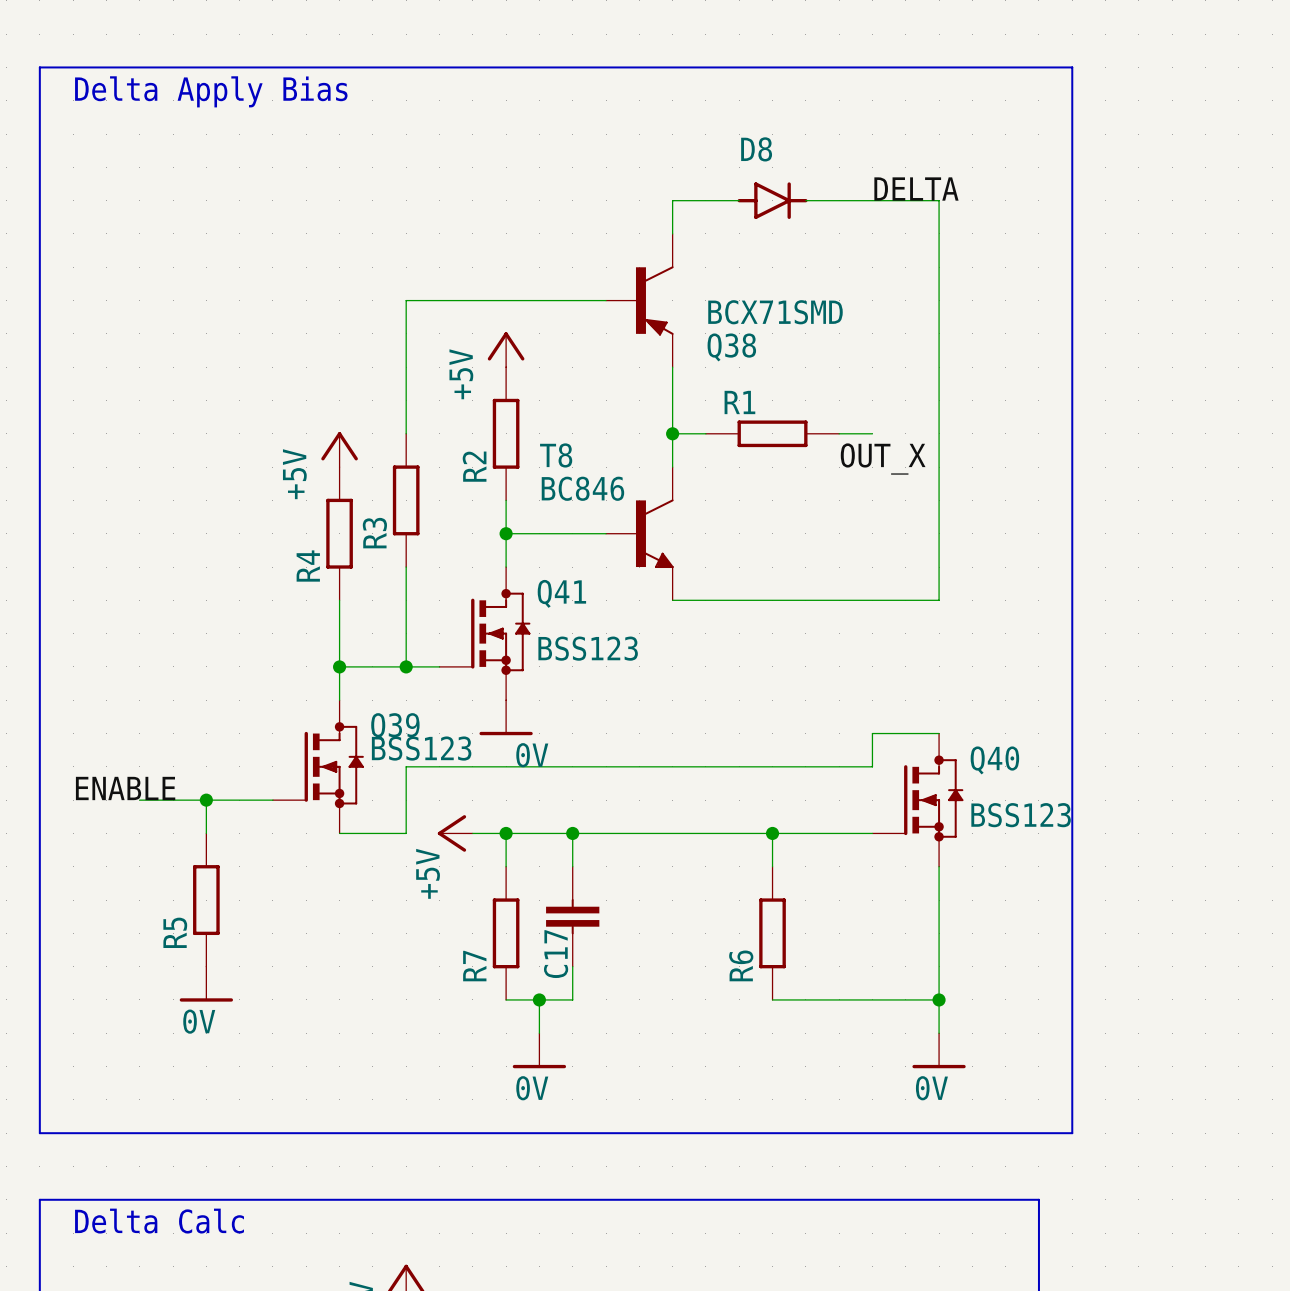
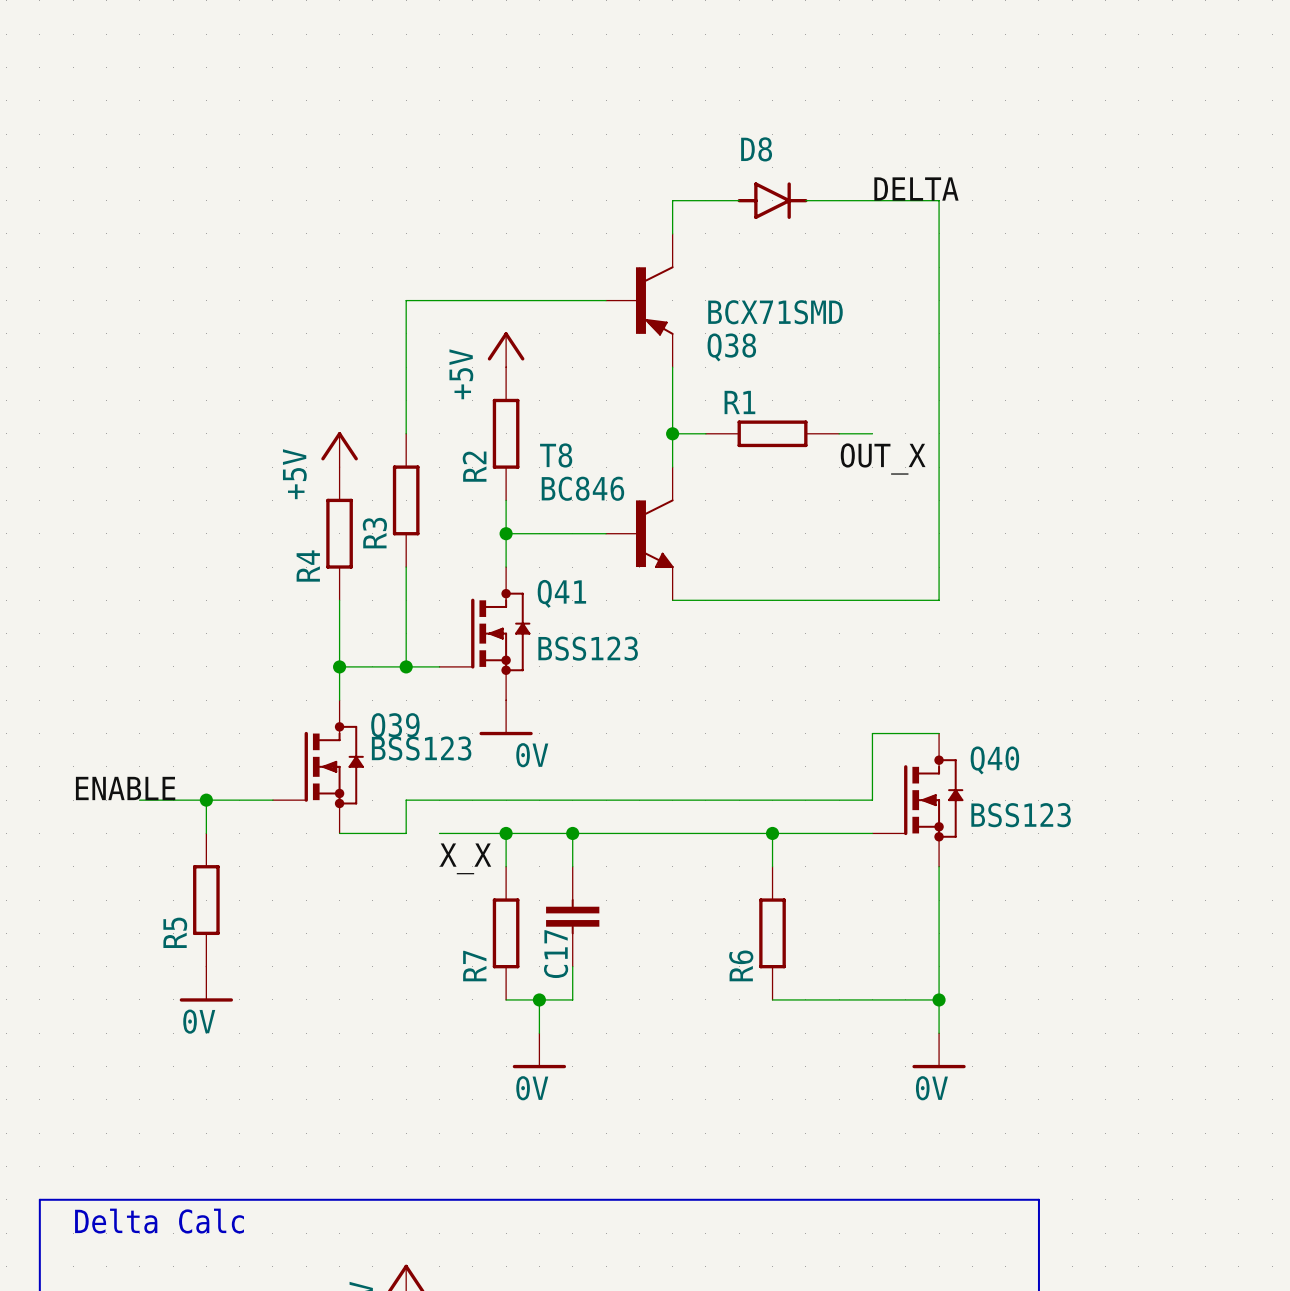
line: (39, 67) (39, 1133) (1072, 1133) (1072, 67) (39, 67) -> none
text: Delta Apply Bias (211, 91) -> none
wire: (872, 766) (406, 766) (406, 800) -> (872, 766) (872, 800) (406, 800)
power symbol: +5V (455, 833) -> none
label: none -> X_X (465, 858)

